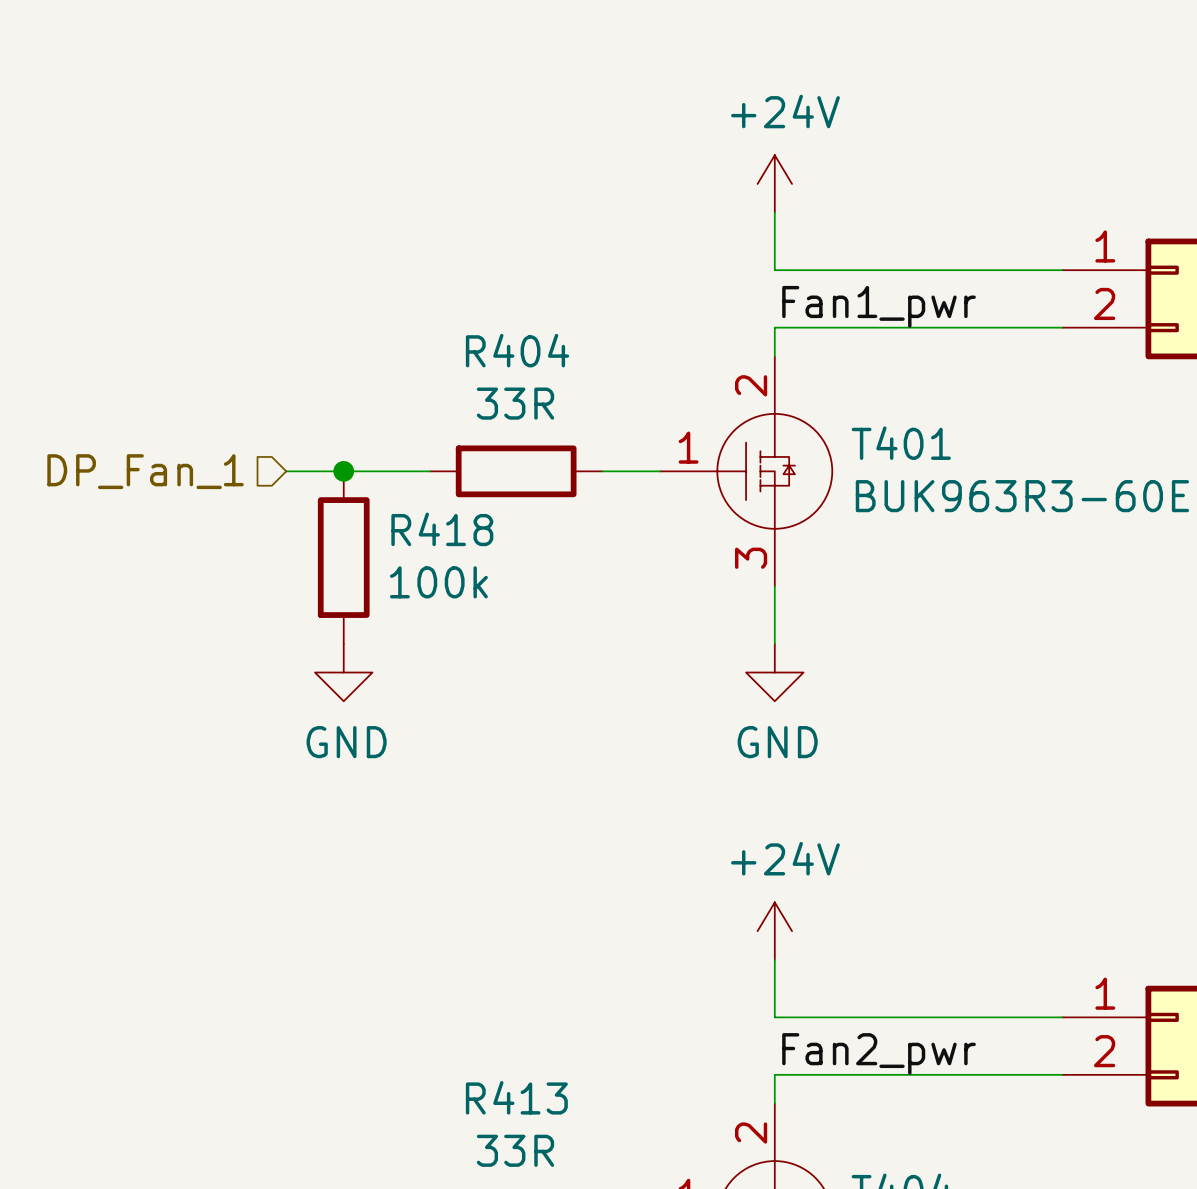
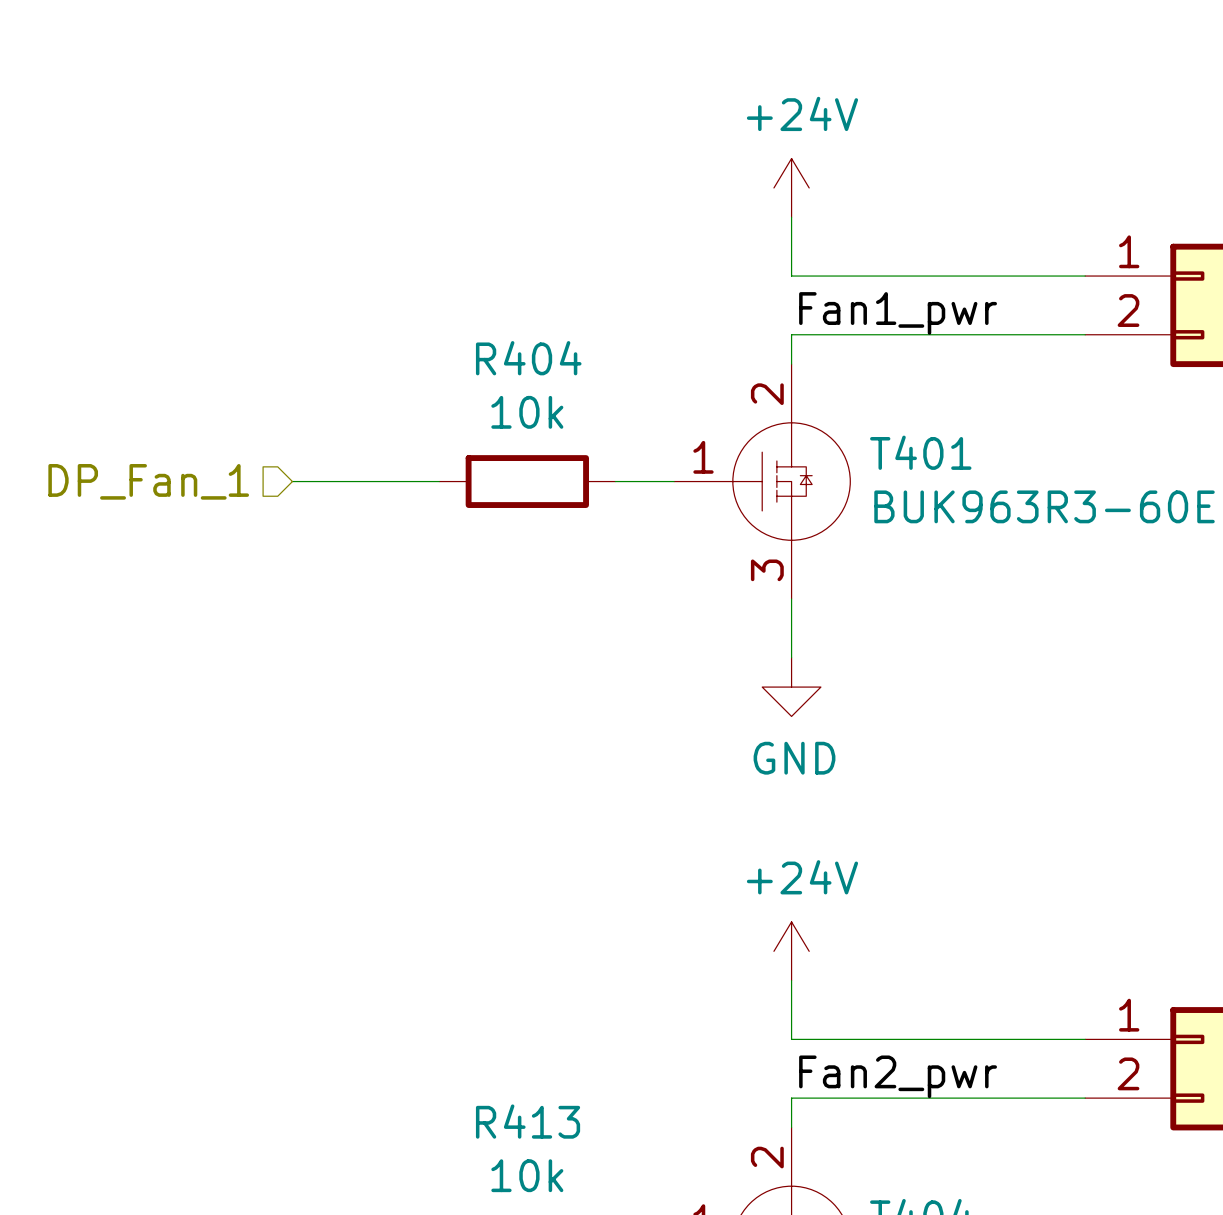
R404 value: 33R (515, 403) -> 10k (527, 412)
junction: (343, 471) -> none
R418: 100k (343, 557) -> none
power symbol: GND (343, 672) -> none
R413 value: 33R (515, 1150) -> 10k (527, 1175)

